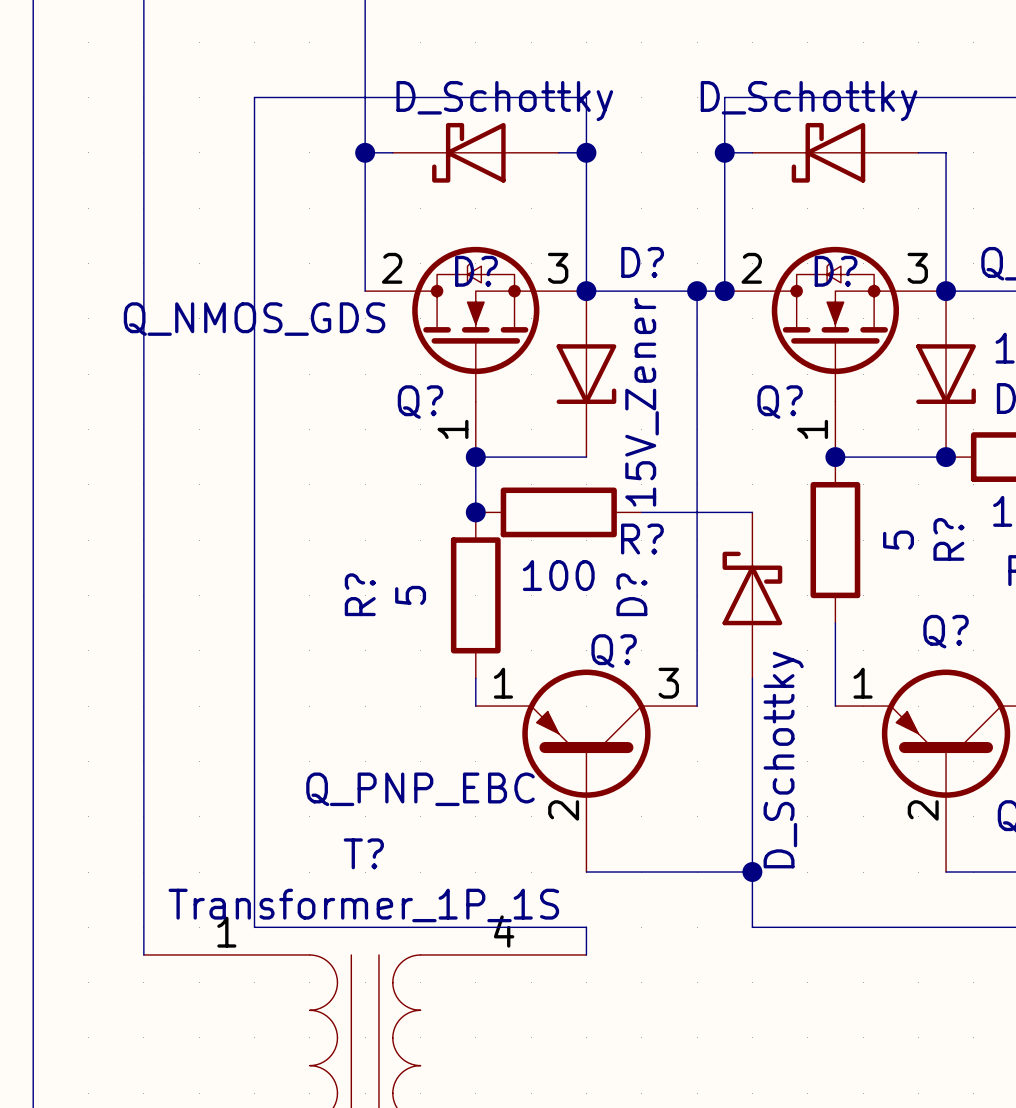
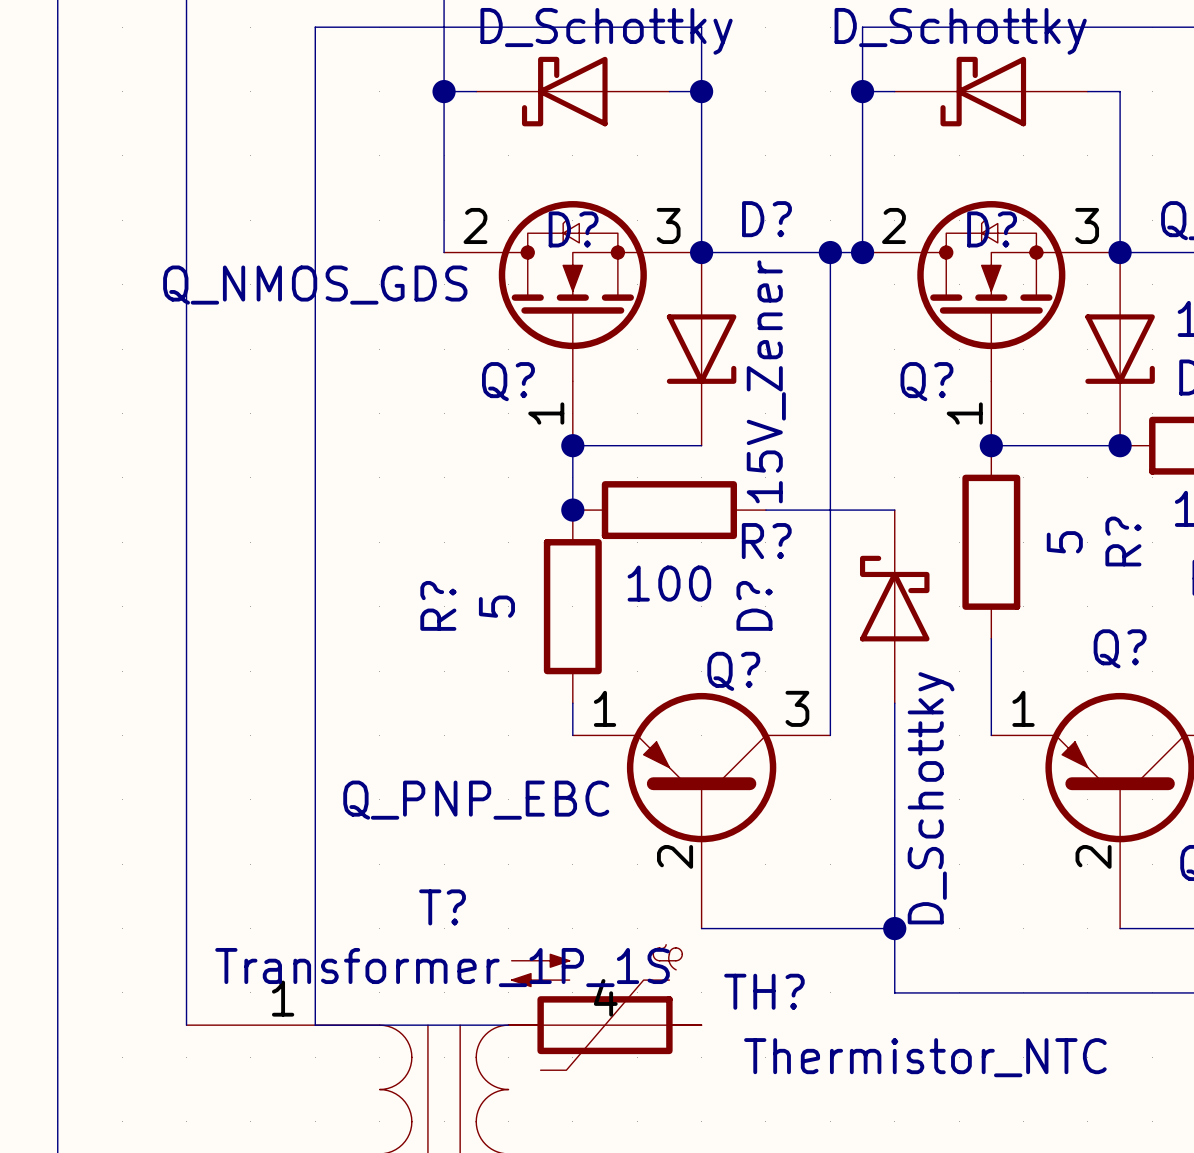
Q? value position: Q_PNP_EBC (420, 789) -> Q_PNP_EBC (476, 800)
wire: (254, 927) (586, 927) (586, 954) -> (315, 992) (315, 1025) (508, 1025)
TH?: none -> Thermistor_NTC (605, 1007)

